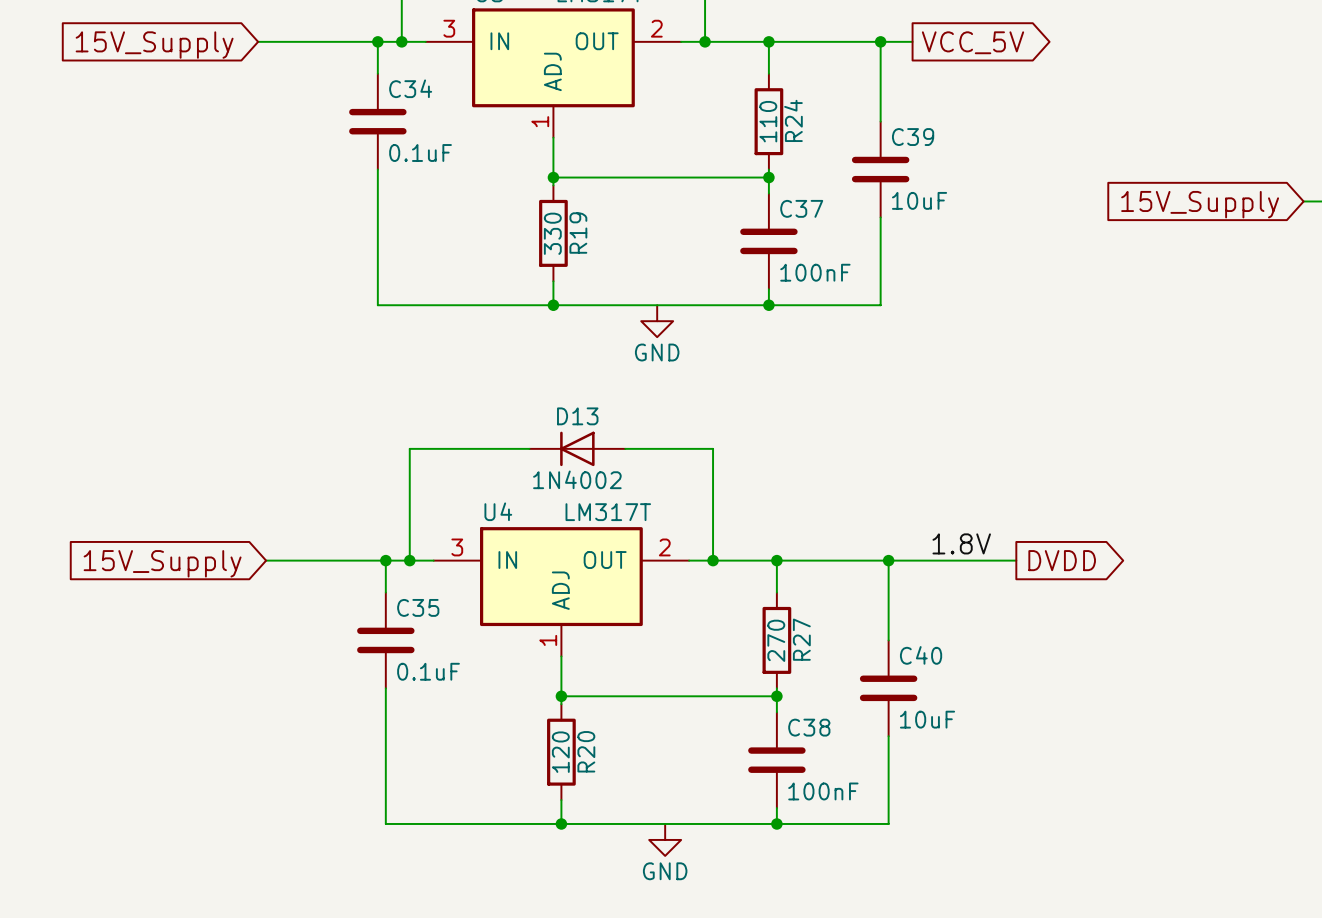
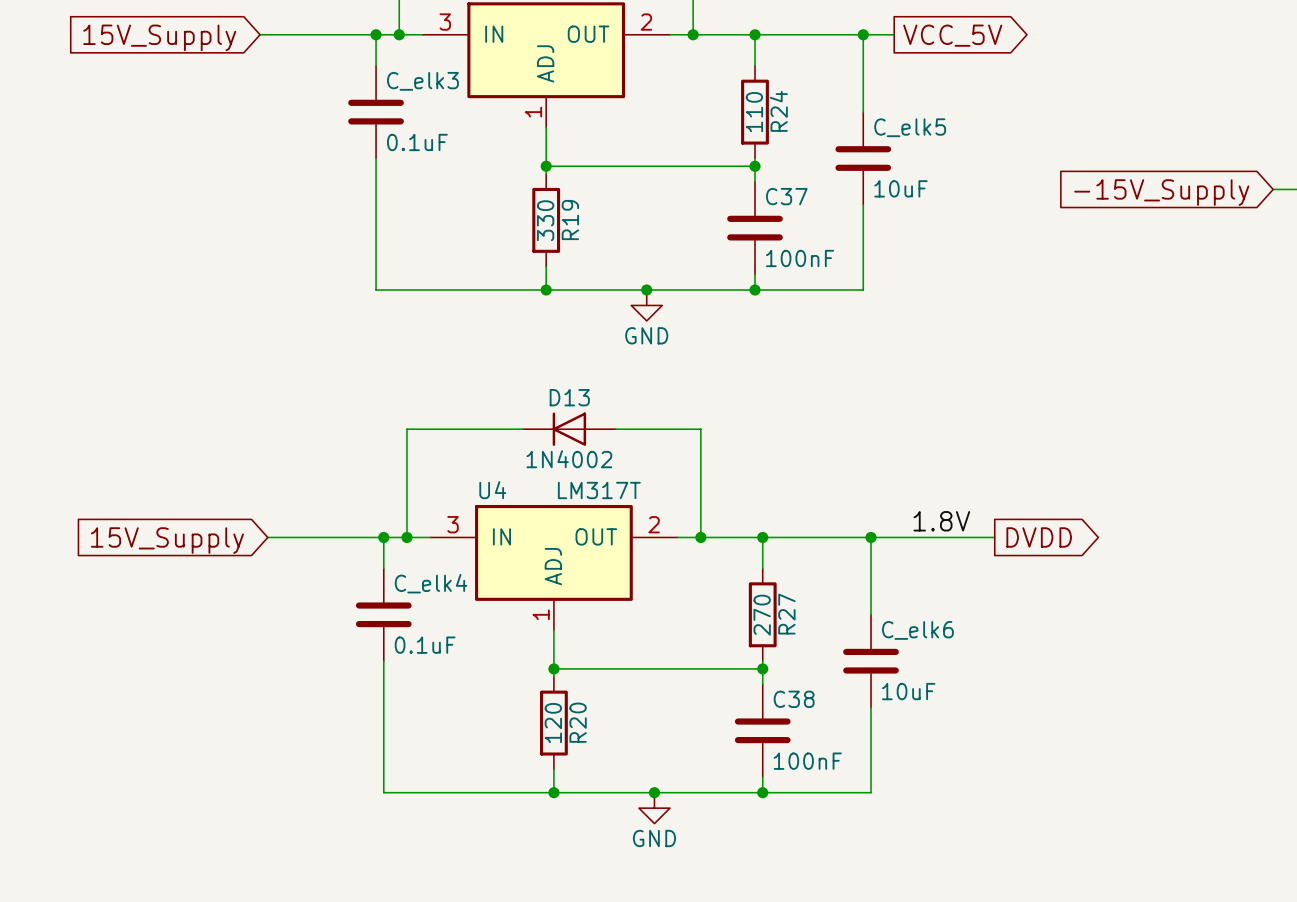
C34 name: C34 (410, 88) -> C_elk3 (422, 81)
C39 name: C39 (913, 137) -> C_elk5 (910, 127)
global label: 15V_Supply (1200, 204) -> -15V_Supply (1161, 192)
junction: none -> (646, 289)
C35 name: C35 (418, 607) -> C_elk4 (431, 583)
C40 name: C40 (921, 655) -> C_elk6 (917, 630)
junction: none -> (654, 792)

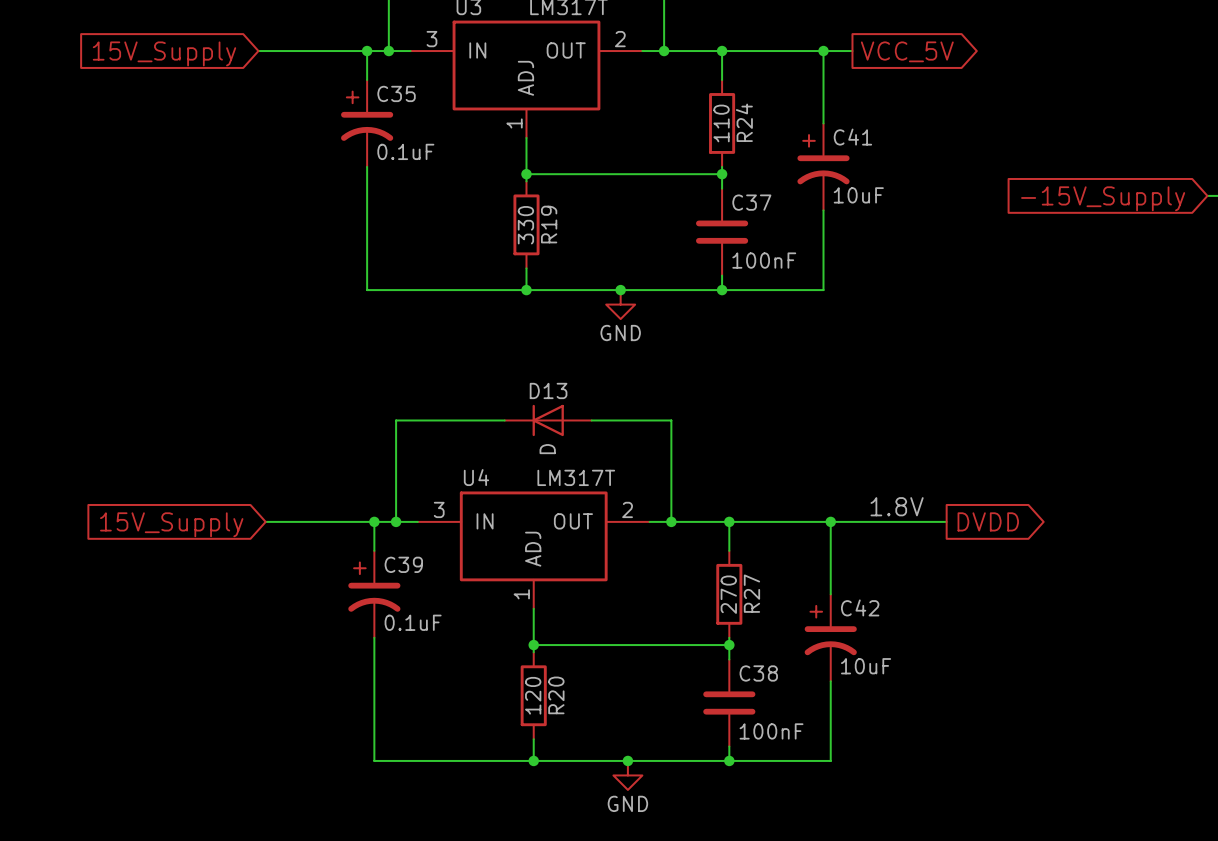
C_elk3: 0.1uF (376, 112) -> none
C35: none -> 0.1uF (367, 123)
C_elk5: 10uF (863, 158) -> none
C41: none -> 10uF (823, 166)
D13 value: 1N4002 (569, 459) -> D (547, 449)
C_elk4: 0.1uF (383, 614) -> none
C39: none -> 0.1uF (374, 594)
C_elk6: 10uF (871, 661) -> none
C42: none -> 10uF (830, 637)

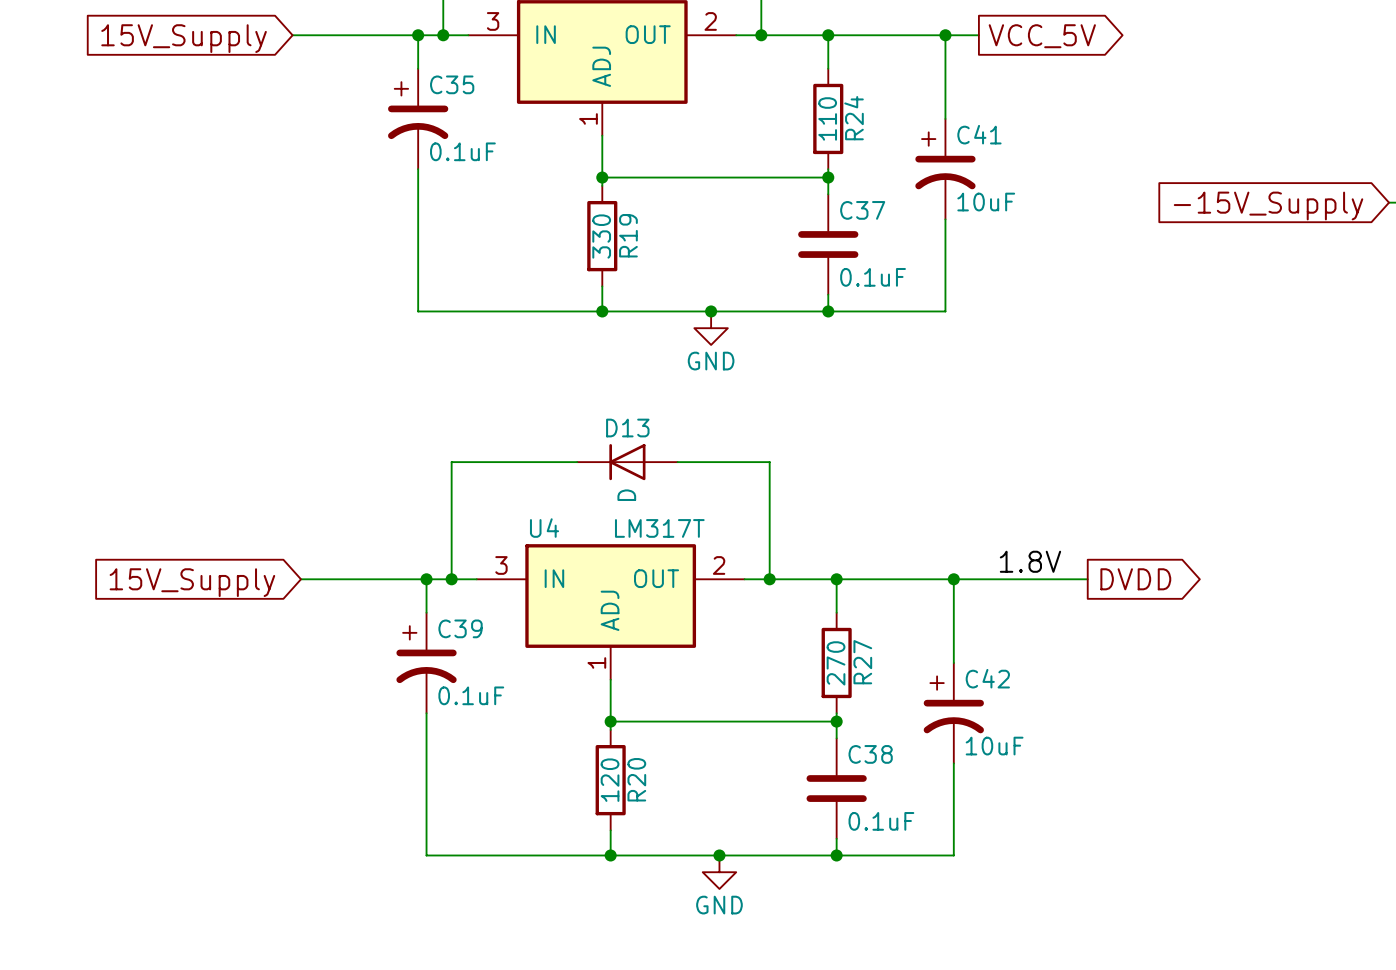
C37 value: 100nF (764, 260) -> 0.1uF (873, 277)
C38 value: 100nF (771, 731) -> 0.1uF (881, 821)

